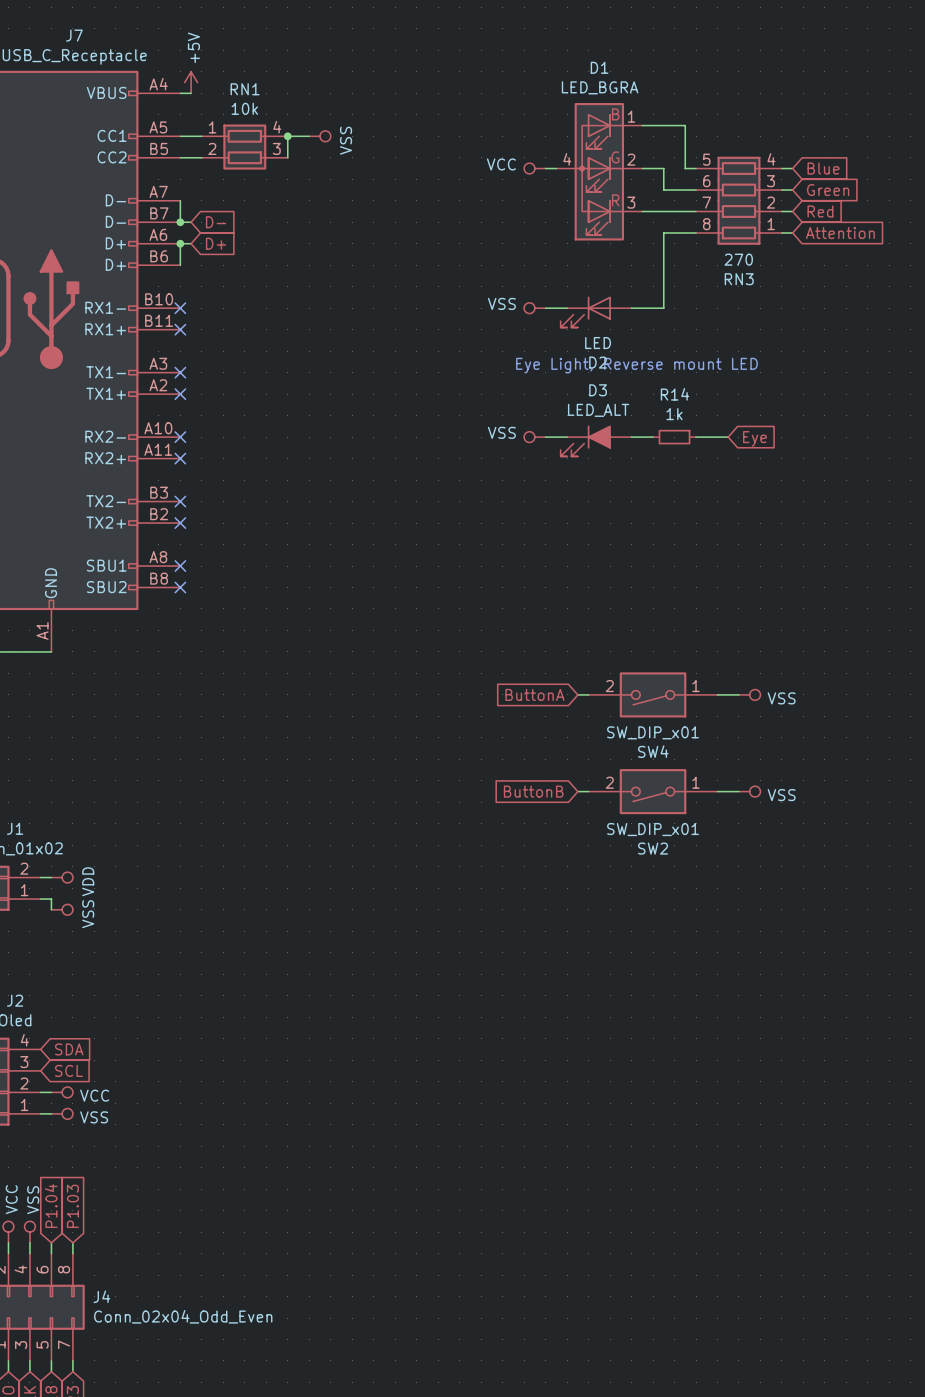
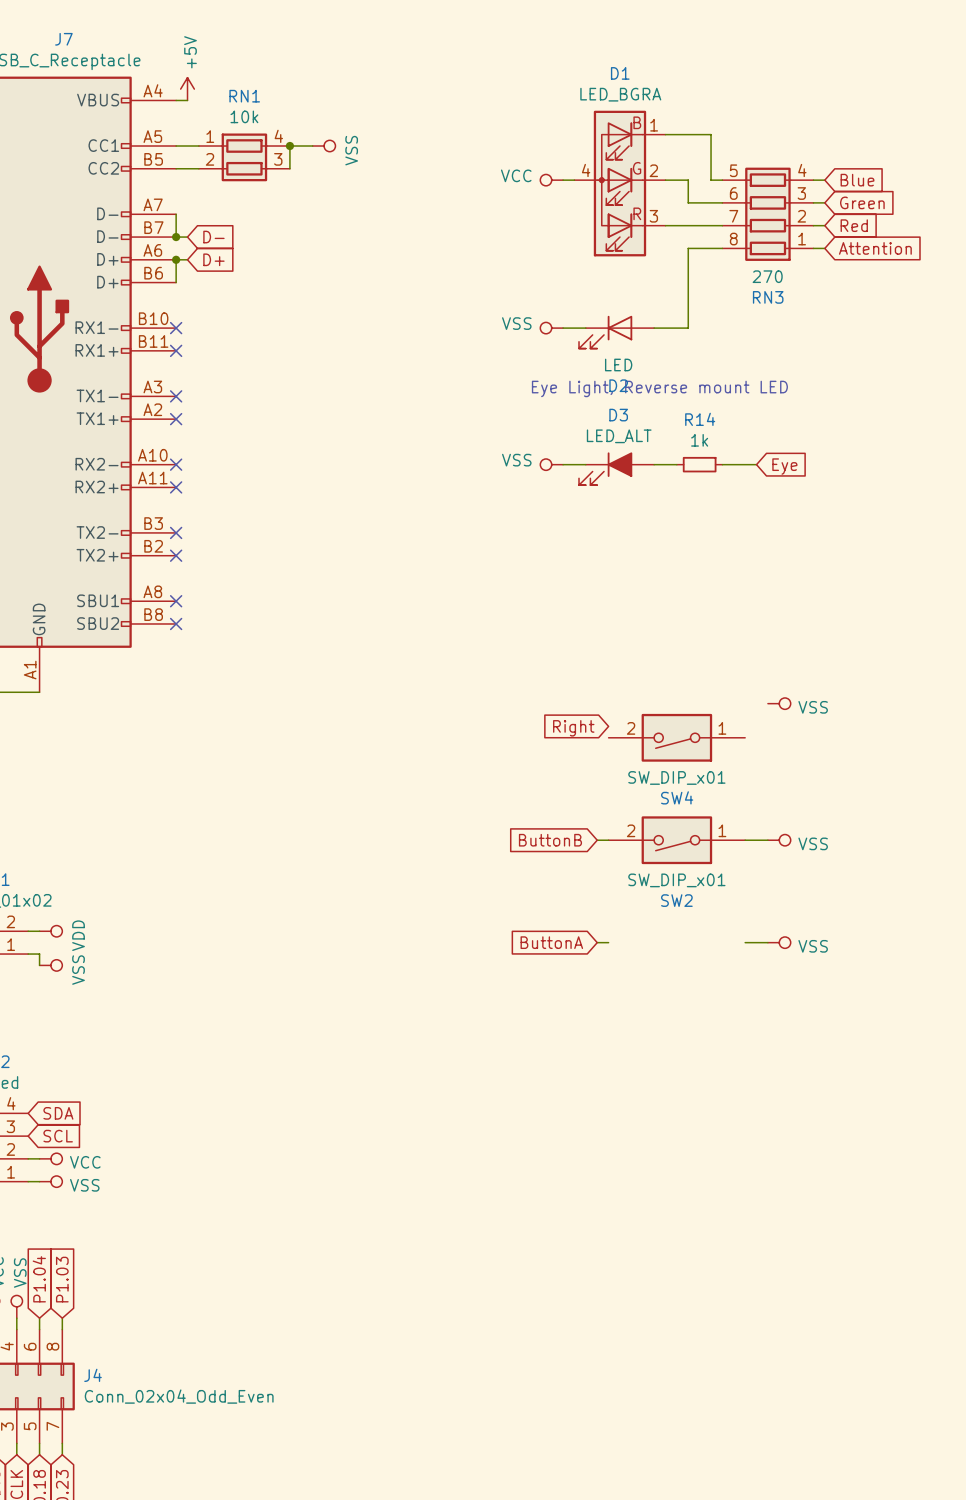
global label: none -> Right (573, 728)
global label position: ButtonA (534, 694) -> ButtonA (551, 942)
wire: (577, 694) (588, 694) -> (597, 942) (608, 942)
wire: (717, 694) (738, 694) -> (745, 942) (767, 942)
power symbol position: VSS (749, 694) -> VSS (779, 703)
power symbol: none -> VSS (779, 942)

